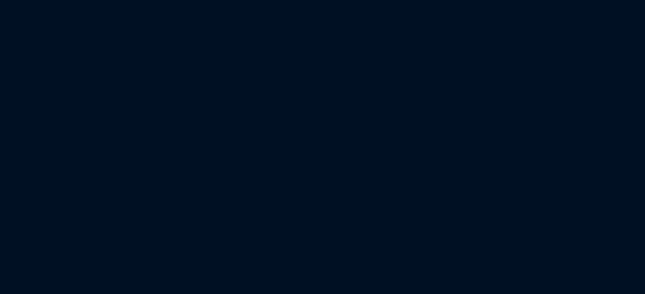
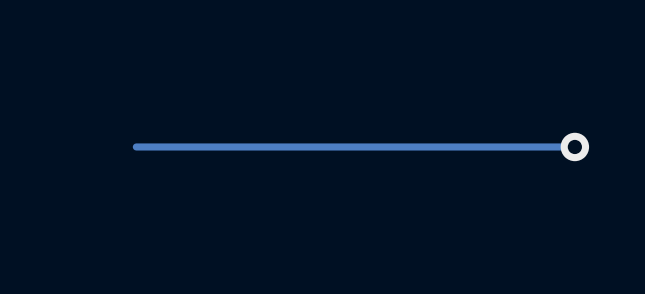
track: none -> (574, 146) (136, 146)
via: none -> (574, 146)

